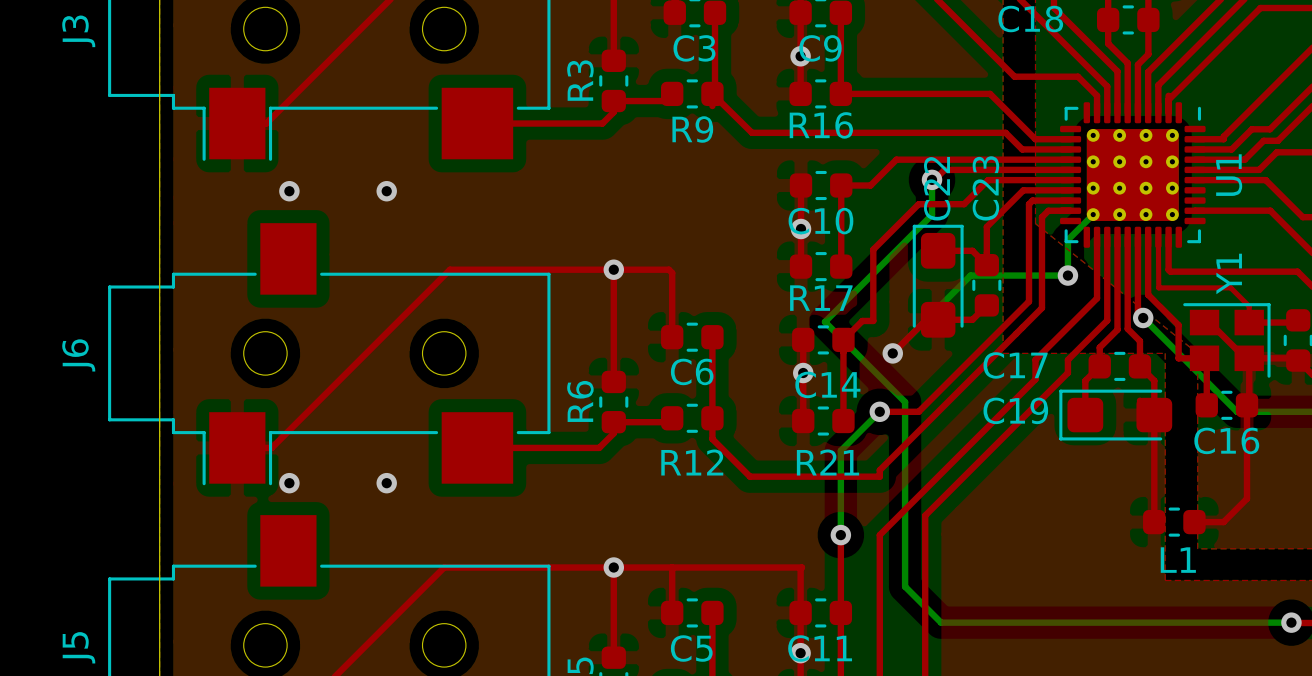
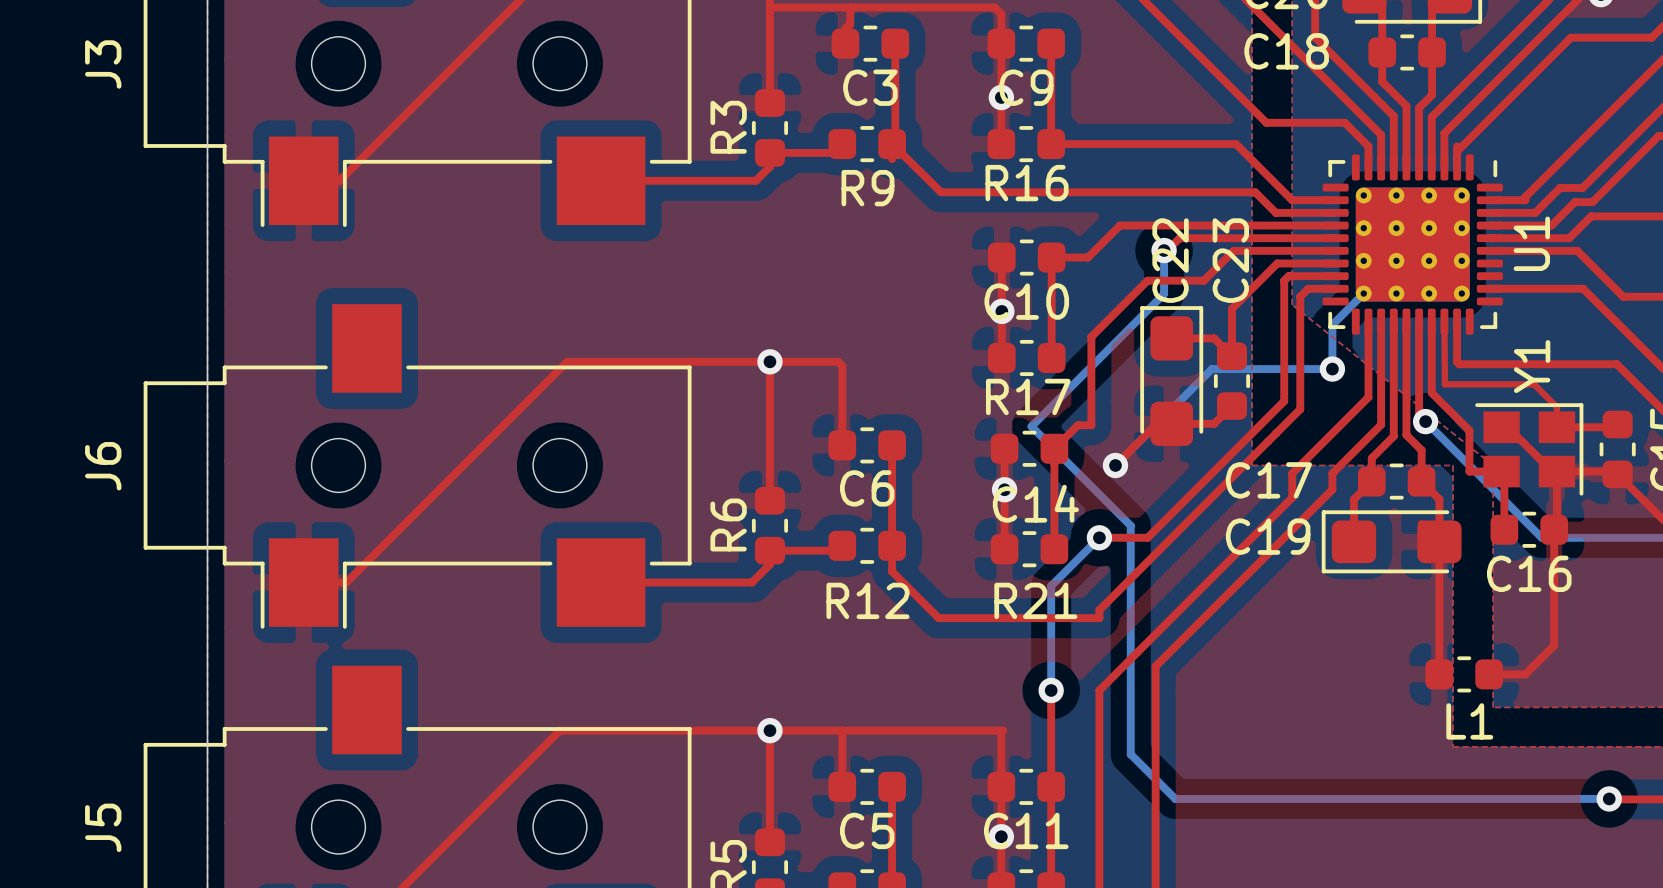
via: (289, 191) -> none
via: (386, 191) -> none
via: (289, 483) -> none
via: (386, 483) -> none

